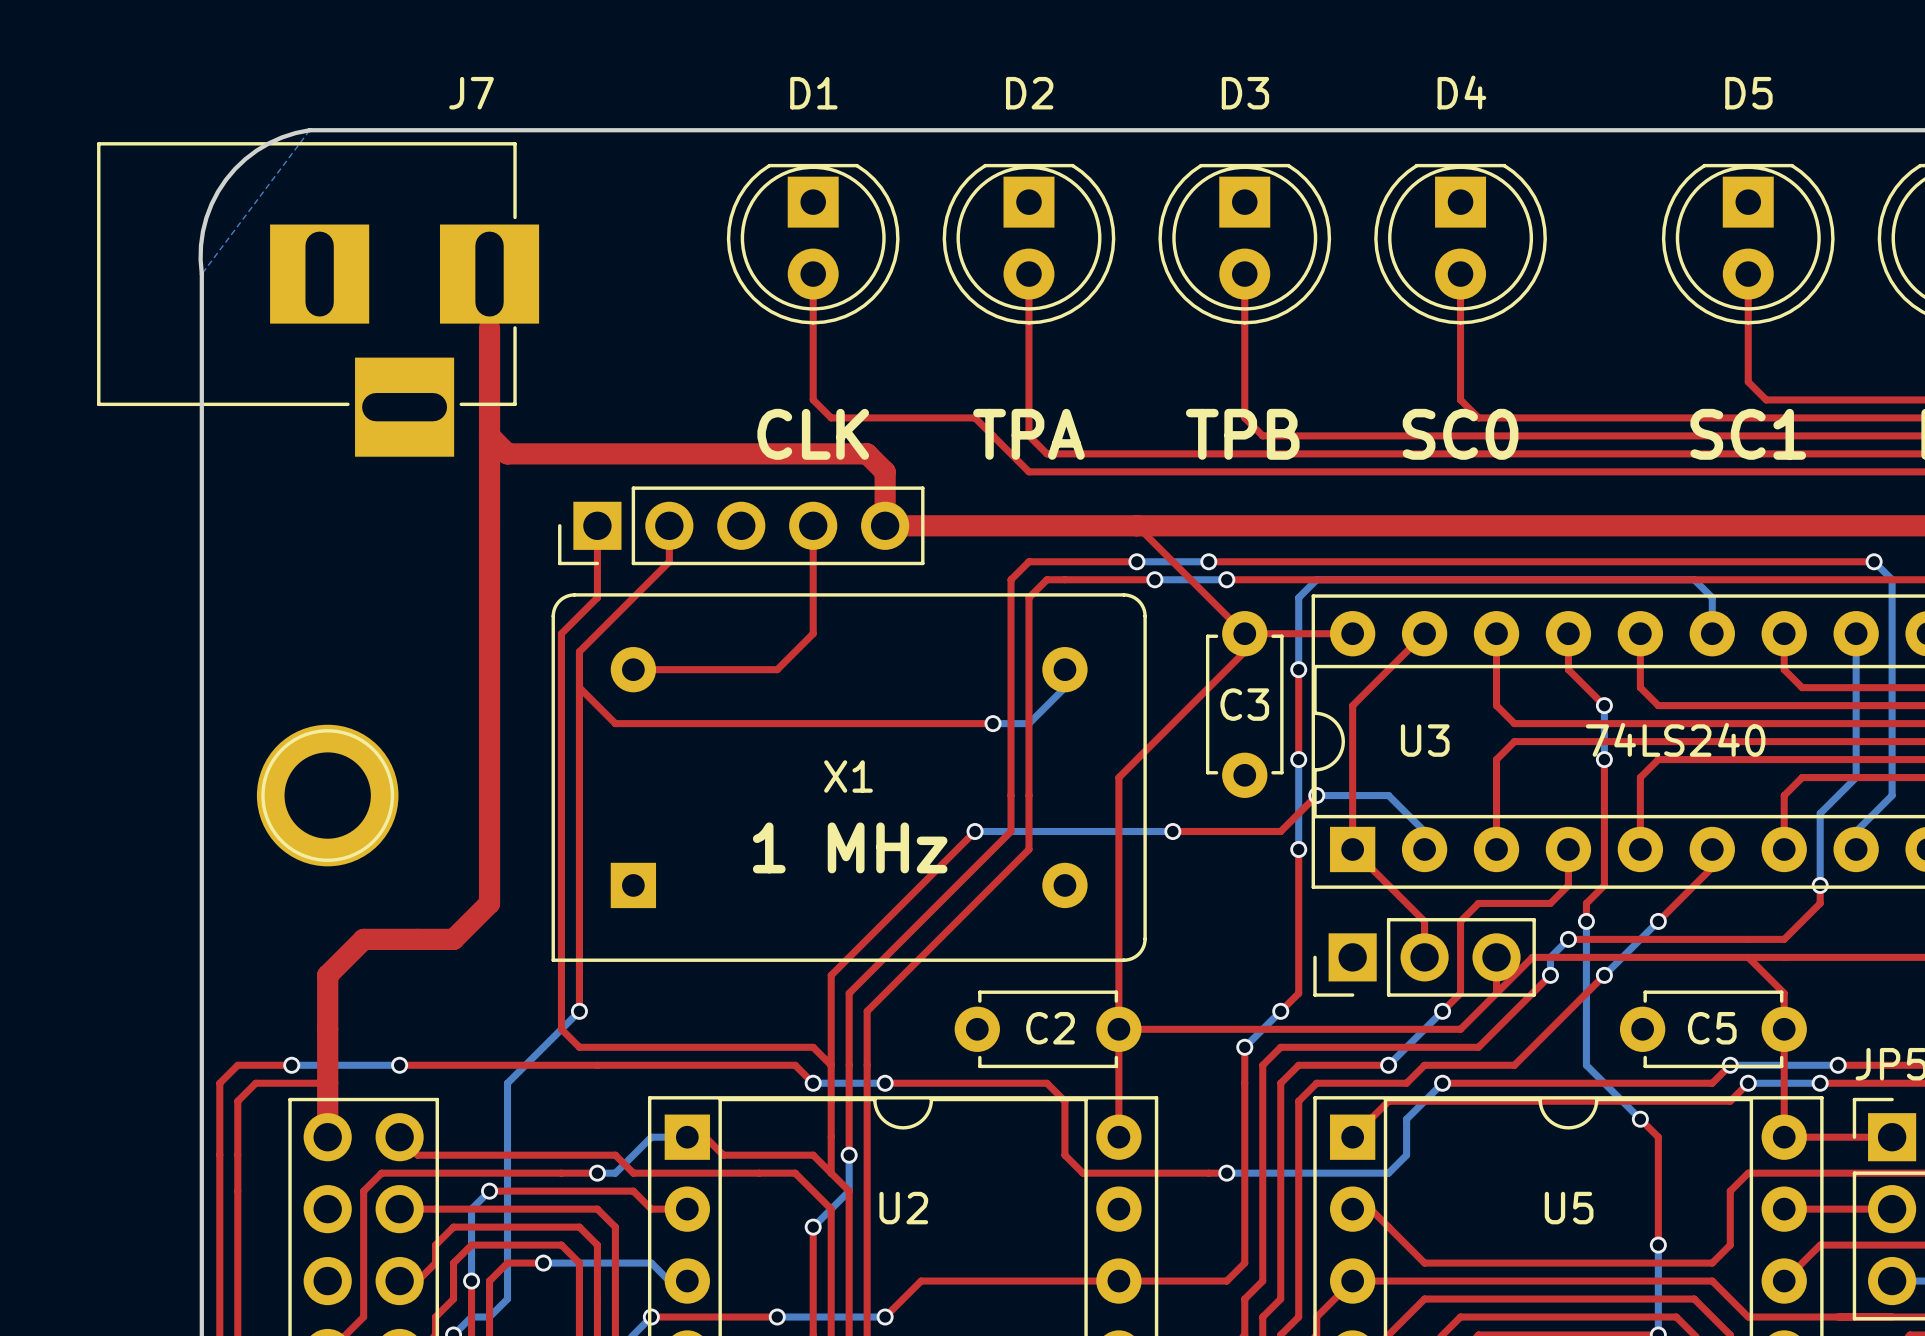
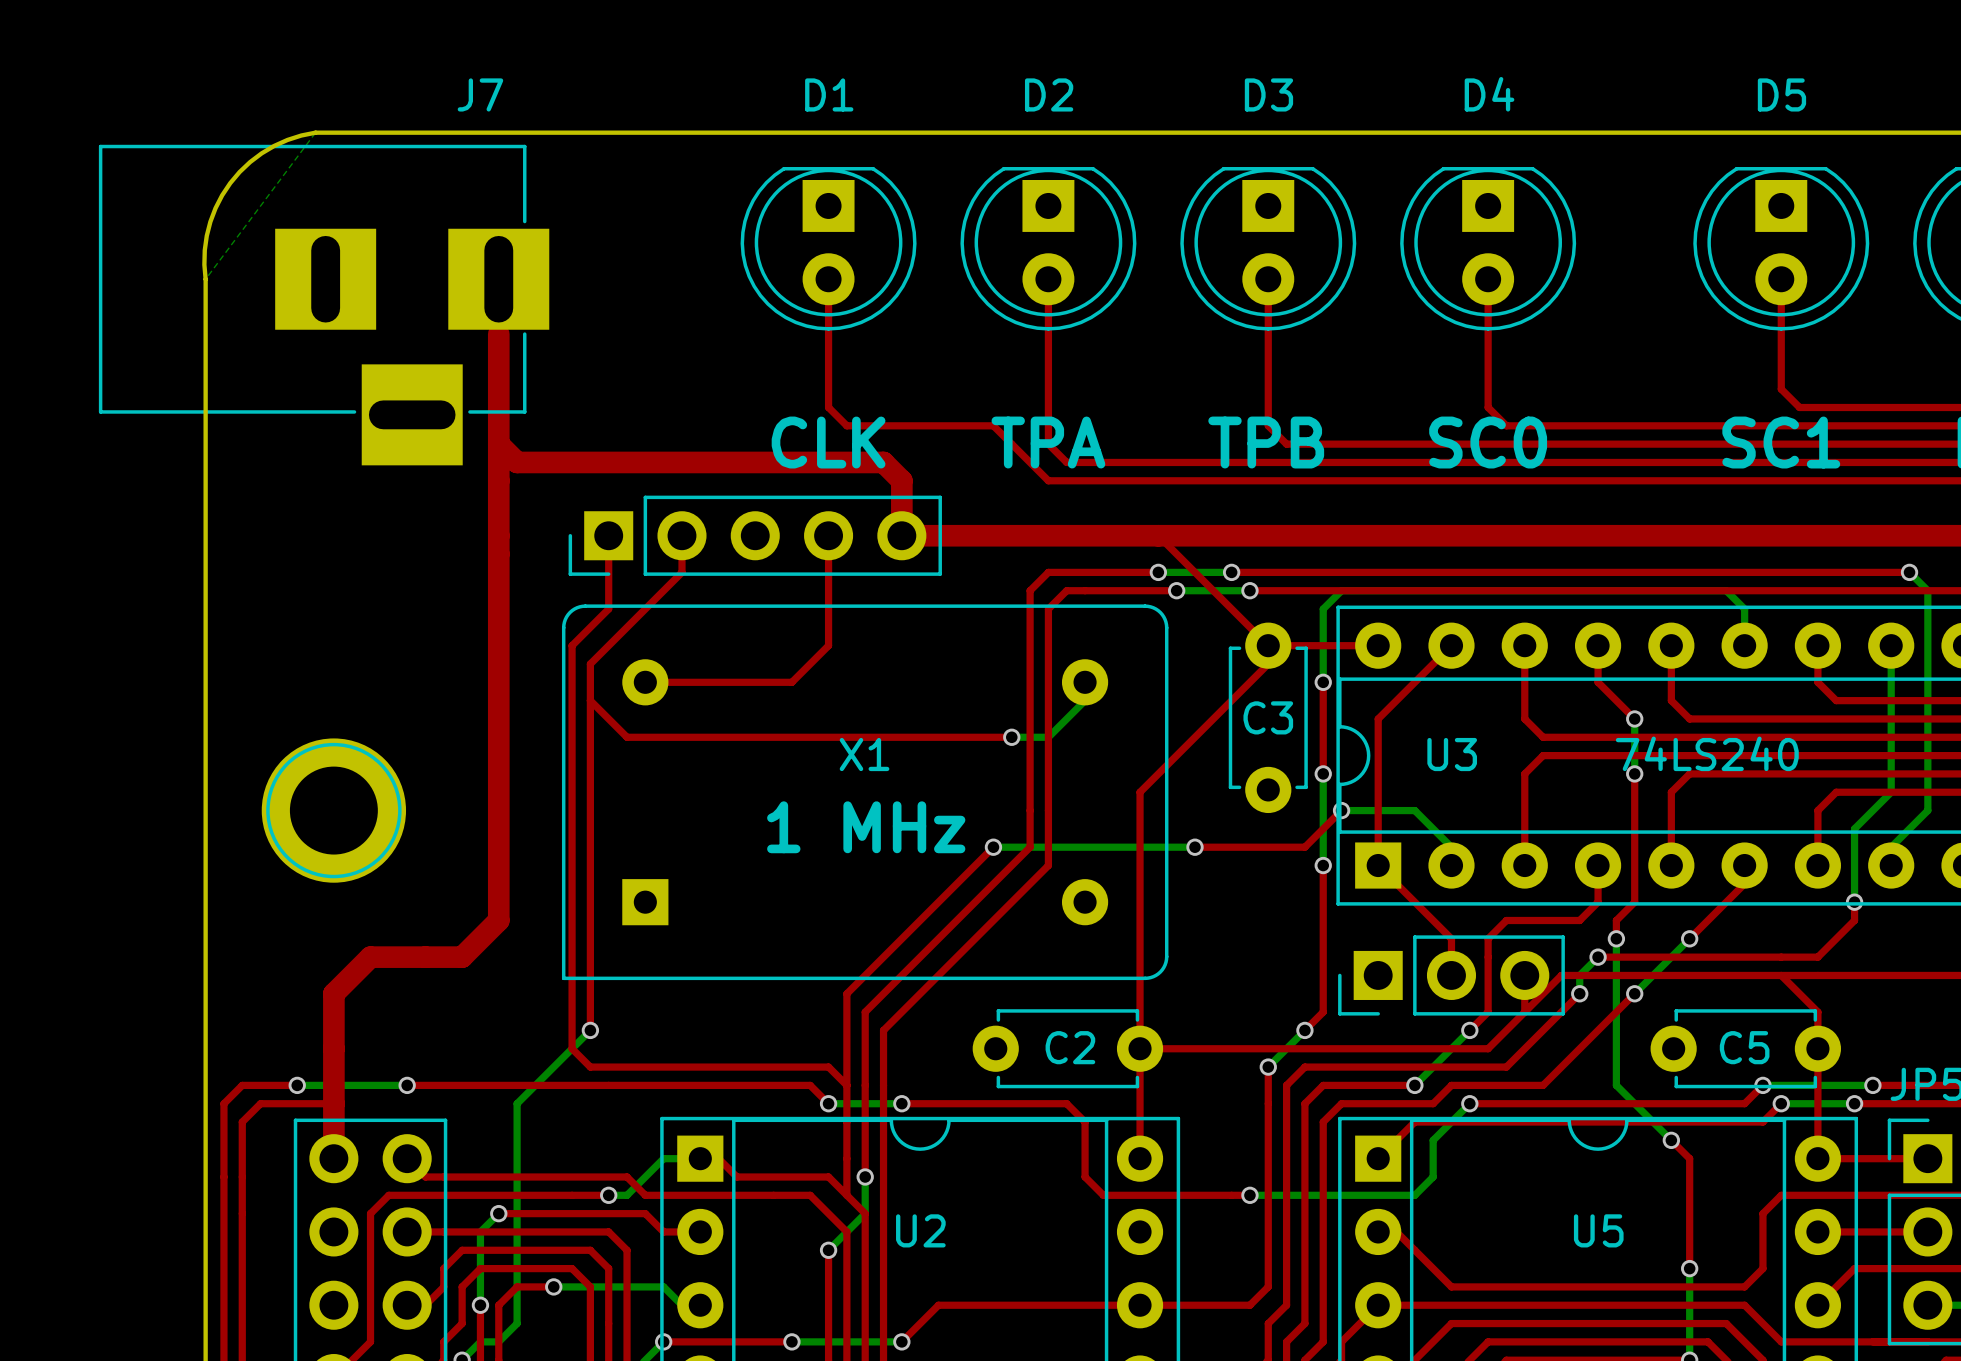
X1 name position: X1 (848, 776) -> X1 (864, 754)
text position: 1 MHz (850, 847) -> 1 MHz (866, 827)

